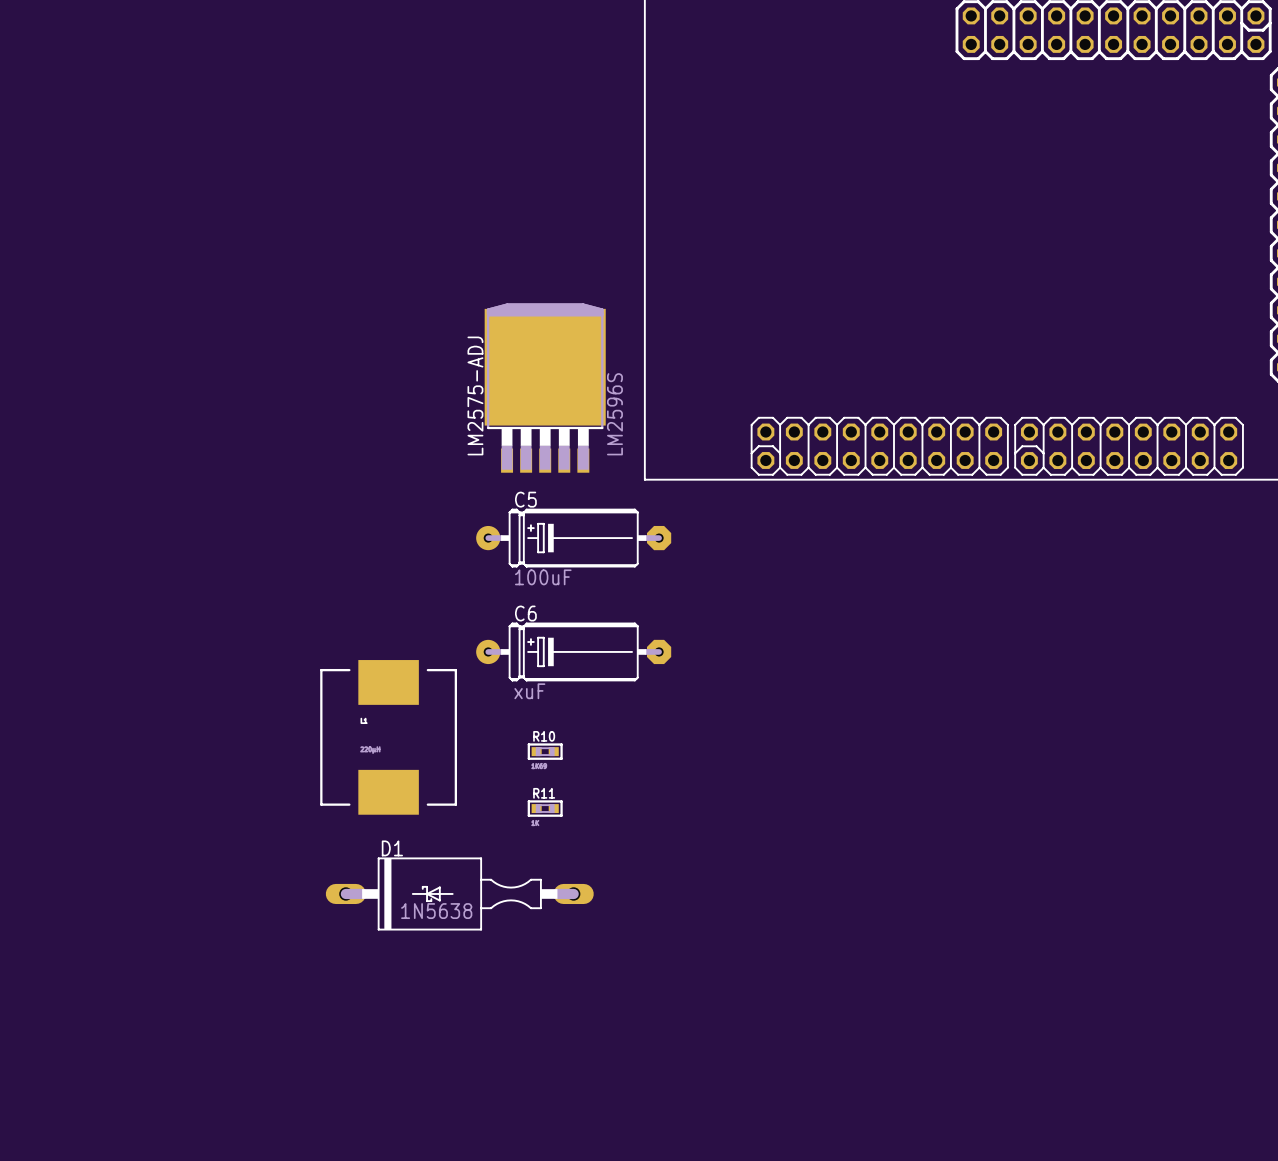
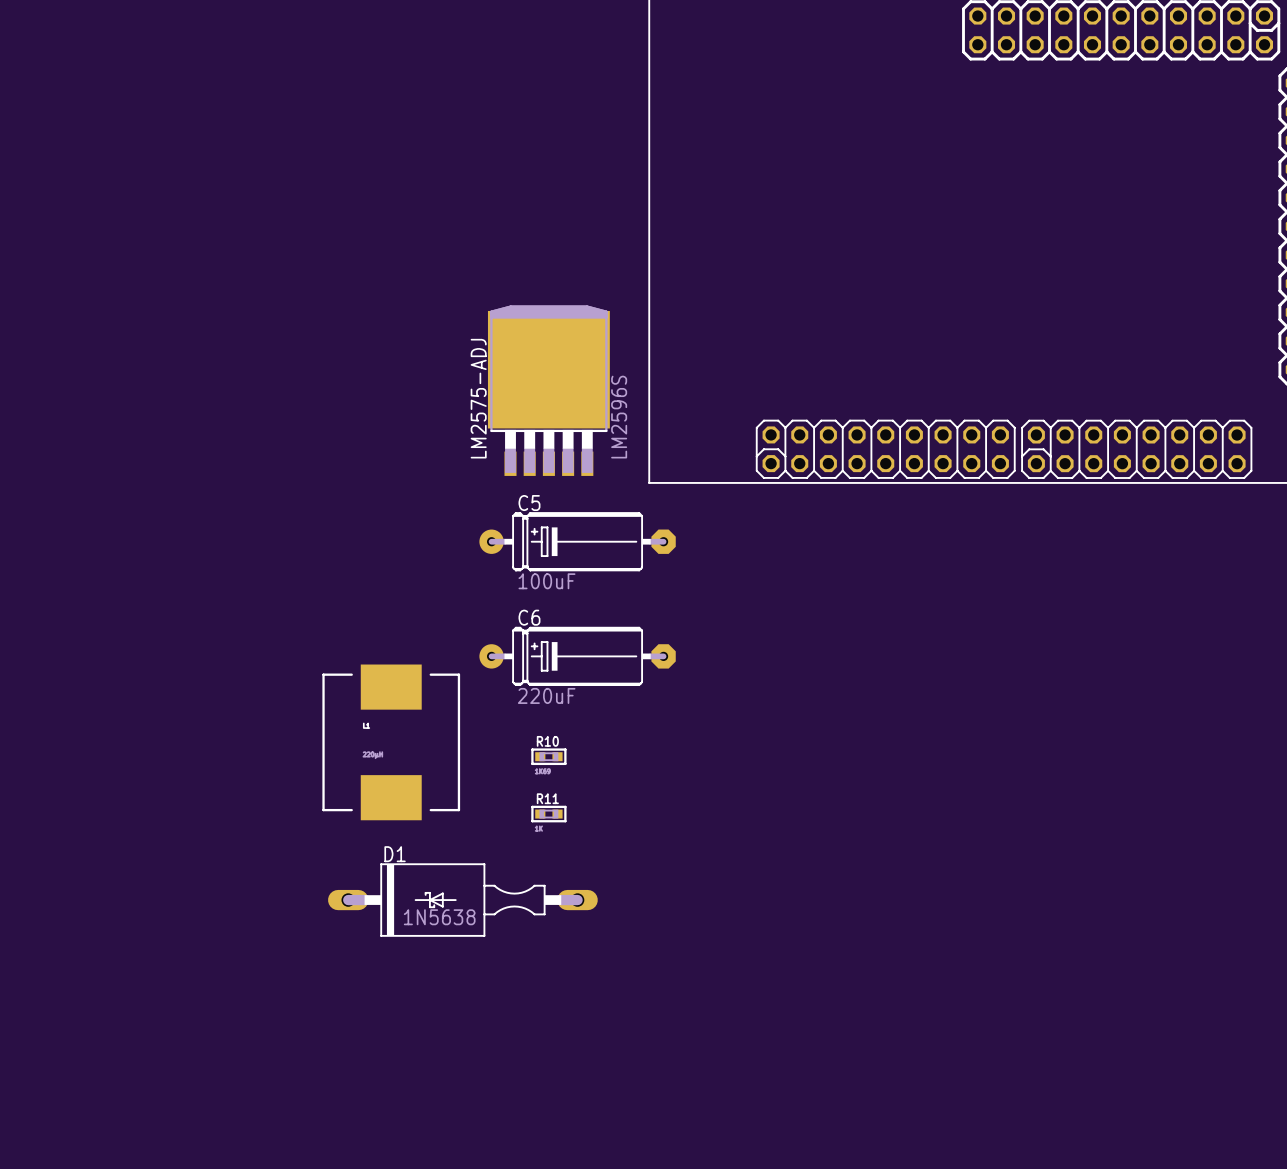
C6 value: xuF (529, 691) -> 220uF (546, 695)

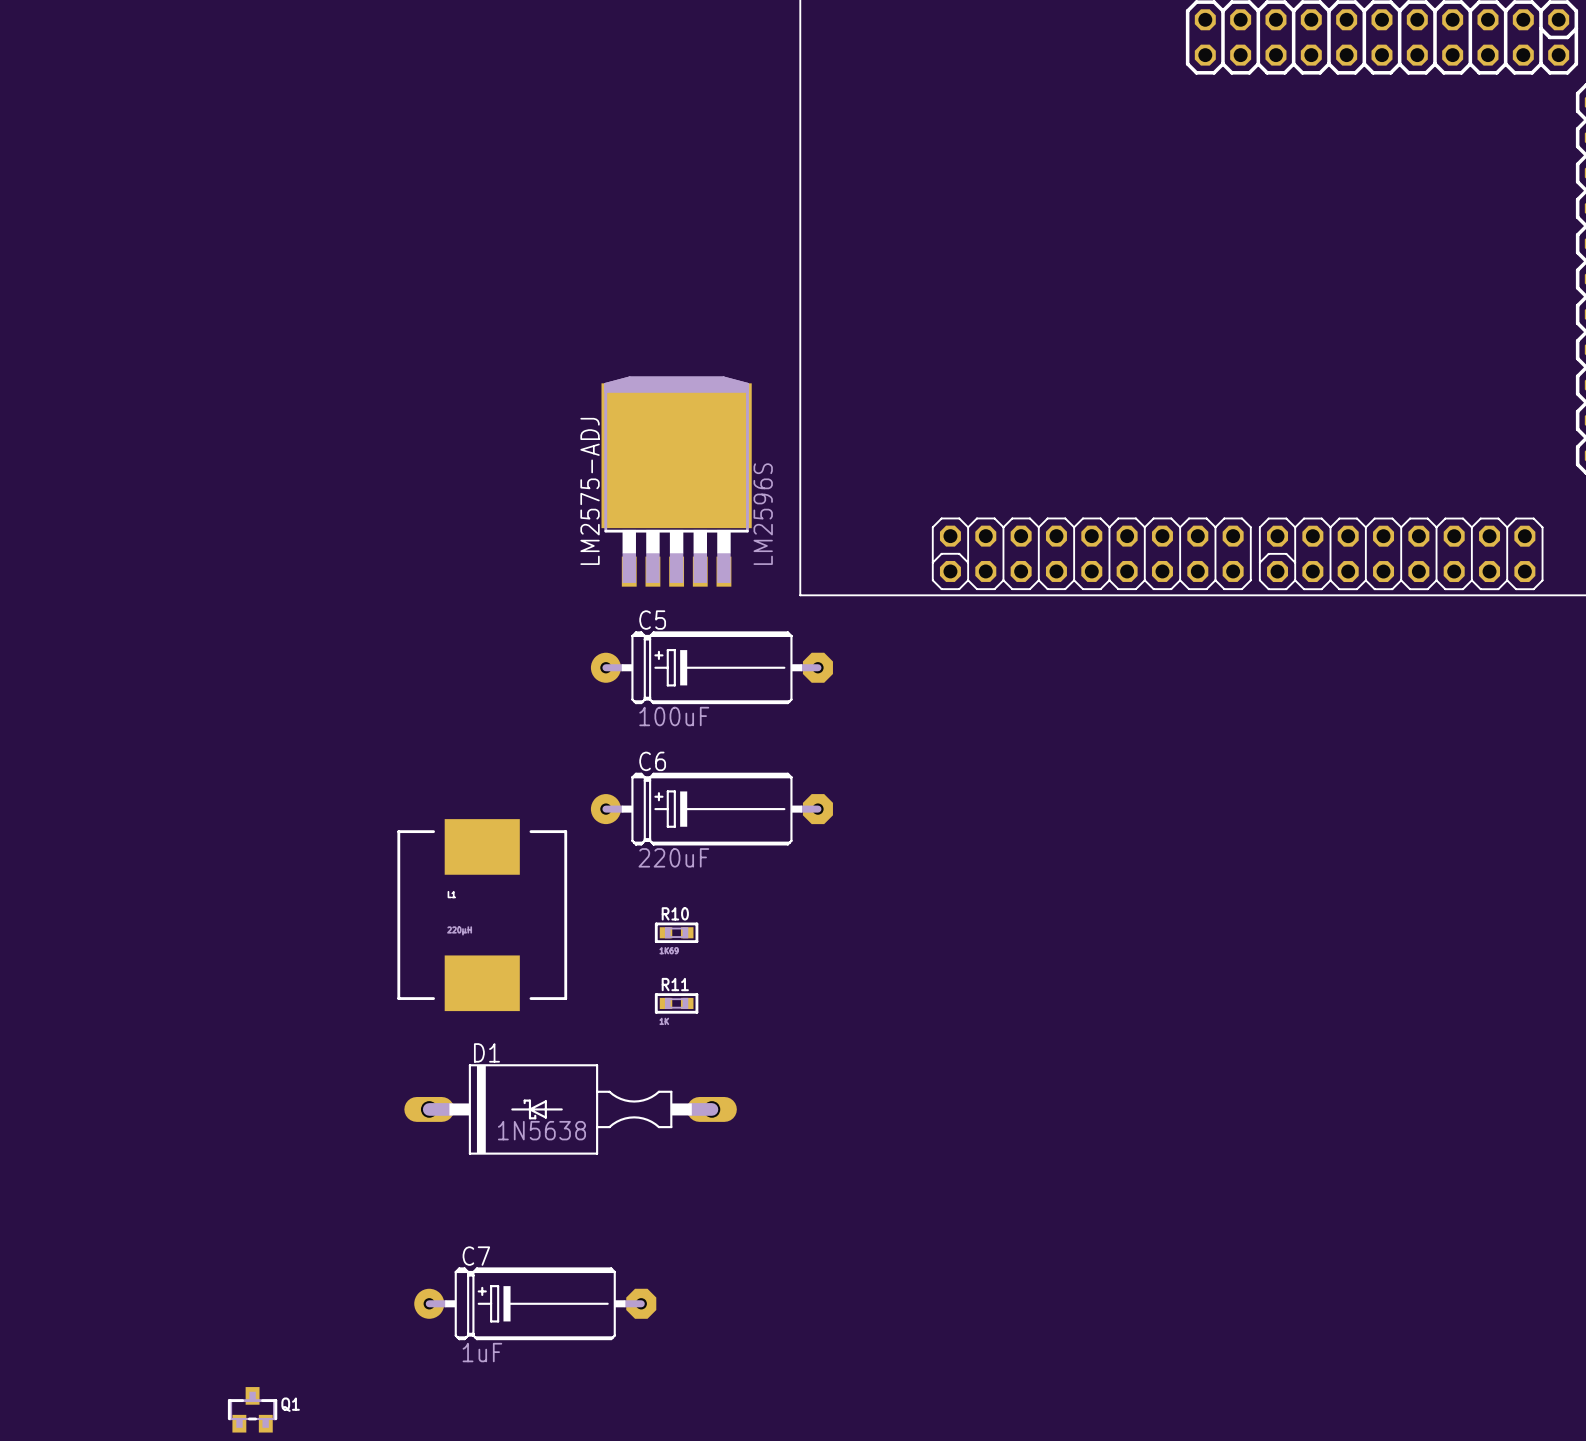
C7: none -> 1uF (535, 1303)
Q1: none -> (252, 1409)

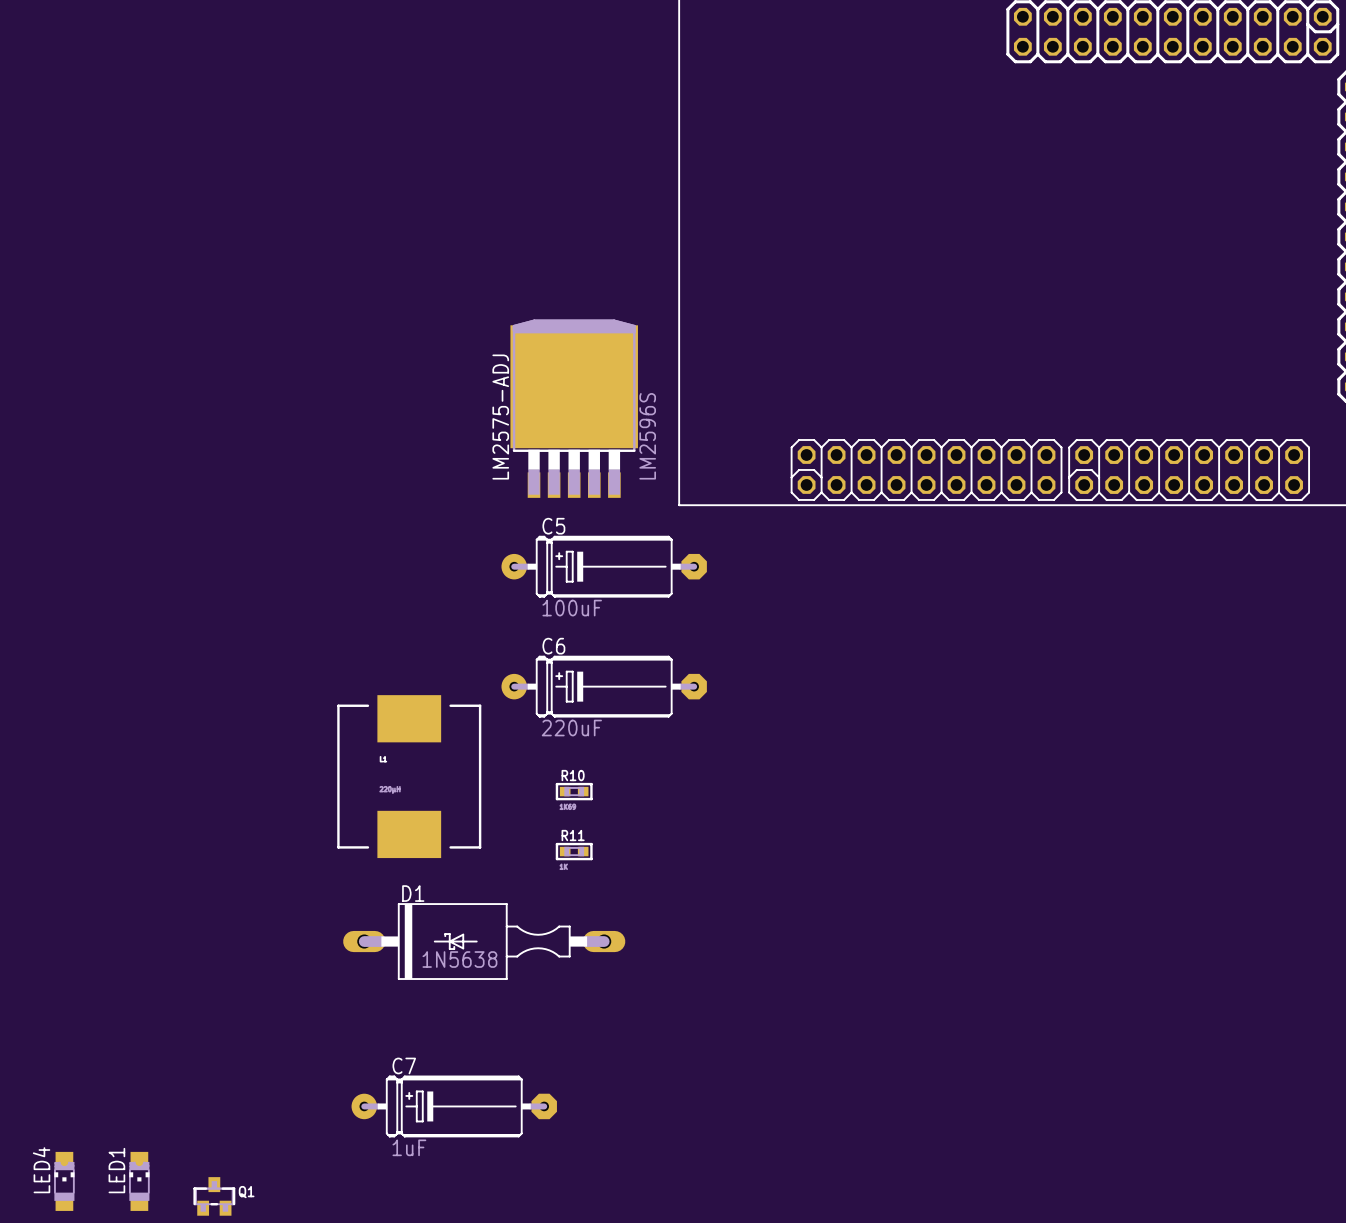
LED4: none -> (64, 1181)
LED1: none -> (139, 1181)

